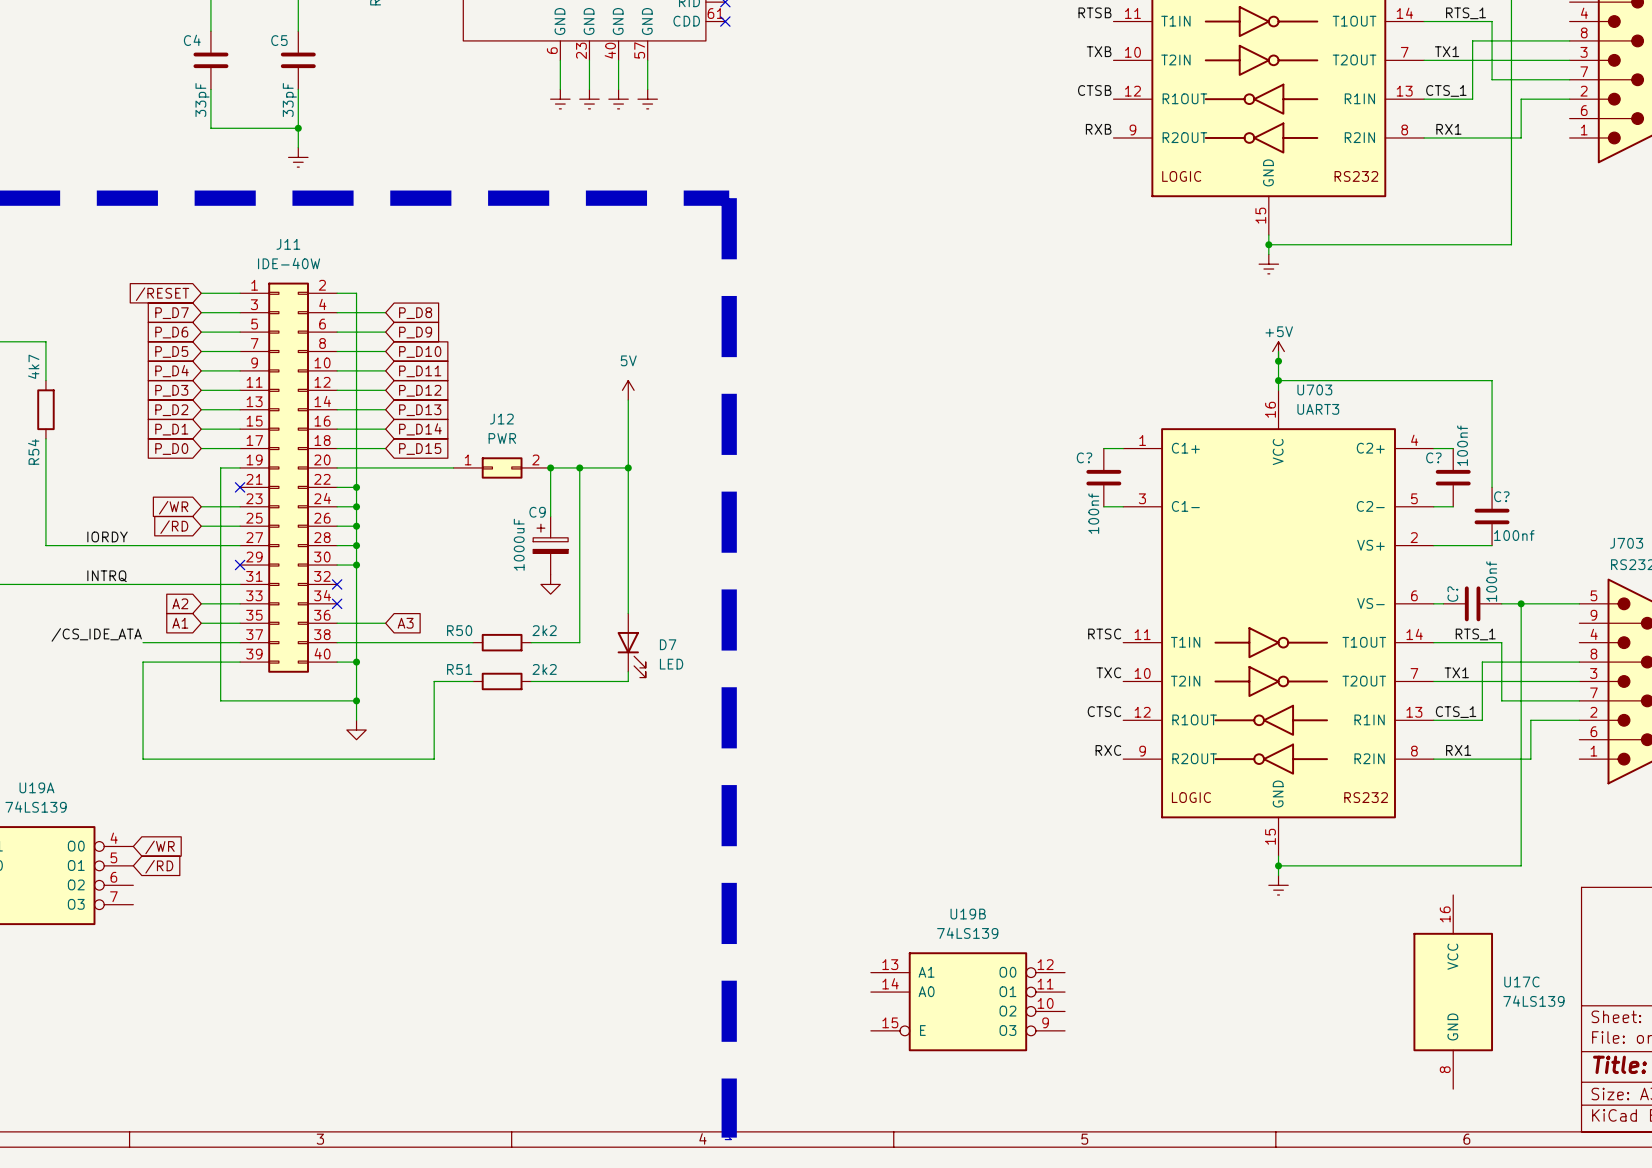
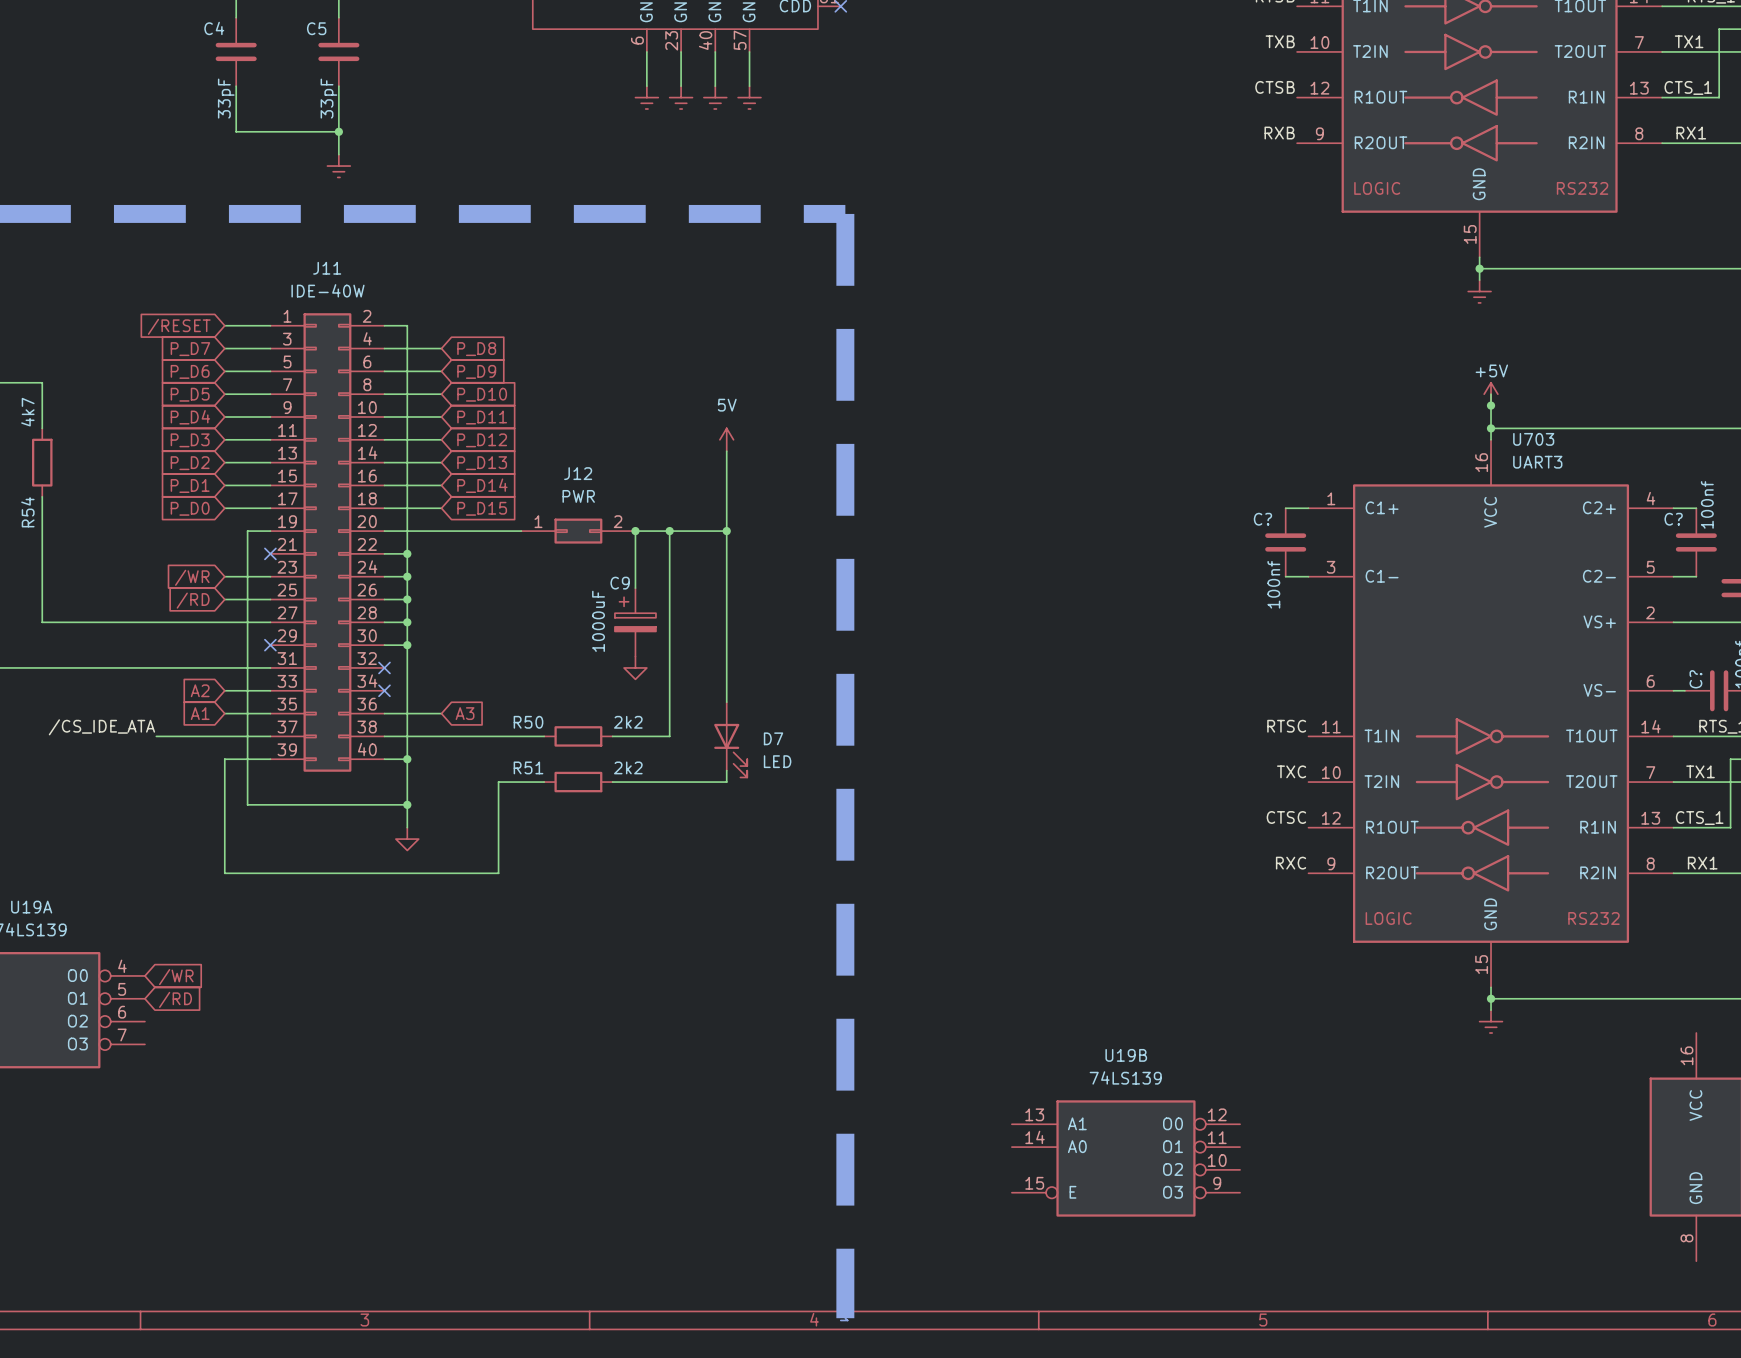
label: IORDY (107, 536) -> none
label: INTRQ (107, 576) -> none
wire: (201, 662) (143, 662) (143, 759) (201, 759) -> (224, 759) (224, 873)

